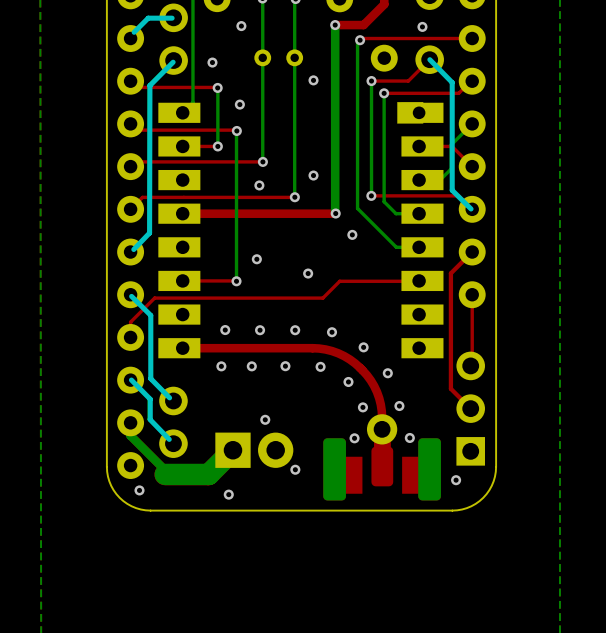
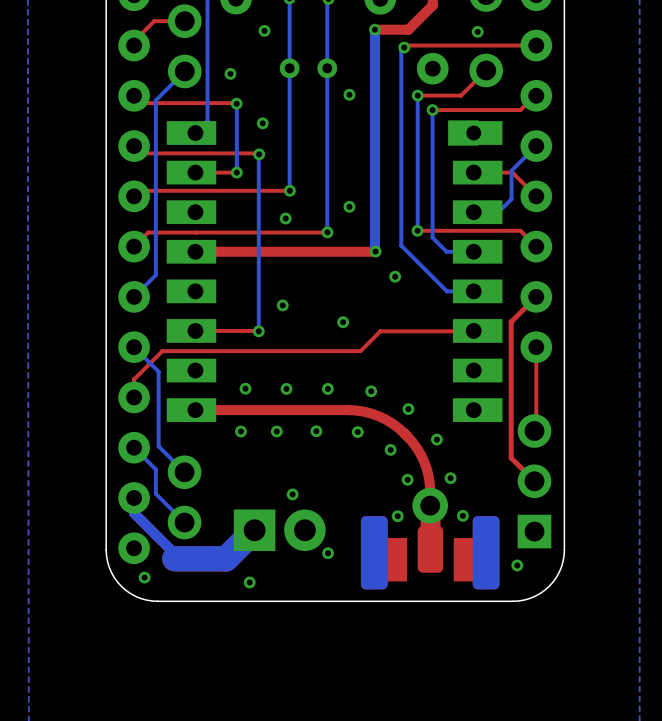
line: (172, 18) (148, 18) (134, 32) -> none
line: (429, 59) (452, 82) (452, 190) (471, 208) -> none
line: (173, 62) (149, 85) (149, 233) (133, 249) -> none
line: (131, 296) (150, 315) (150, 378) (169, 397) -> none
line: (131, 380) (150, 399) (150, 419) -> none
line: (150, 419) (169, 439) -> none

